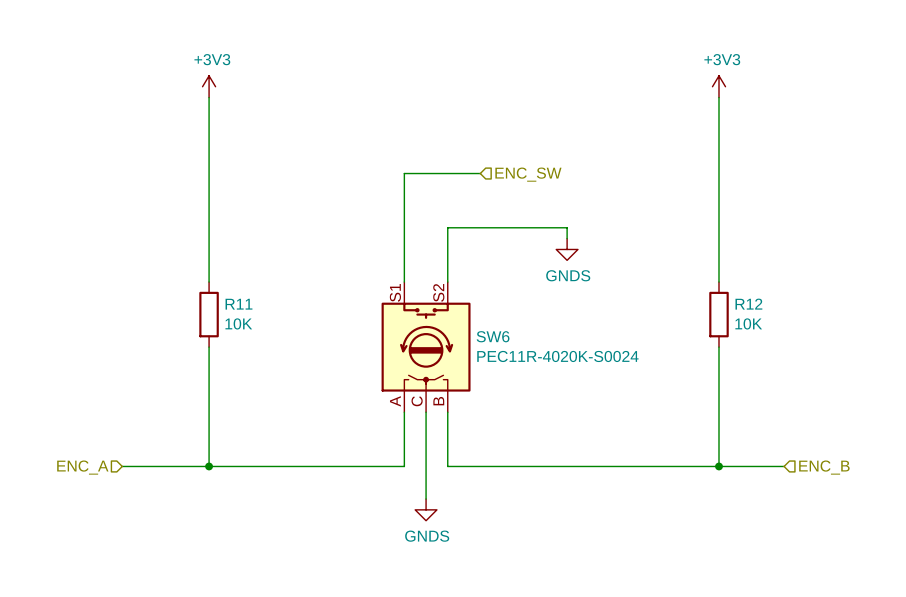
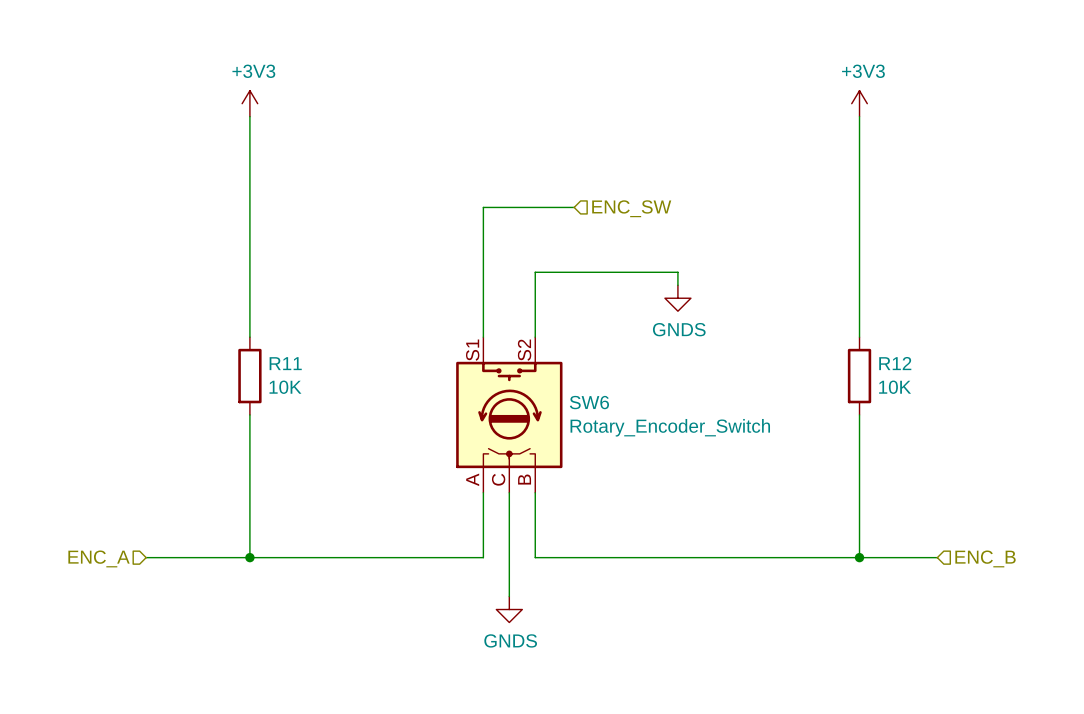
SW6 value: PEC11R-4020K-S0024 (557, 356) -> Rotary_Encoder_Switch (670, 427)

